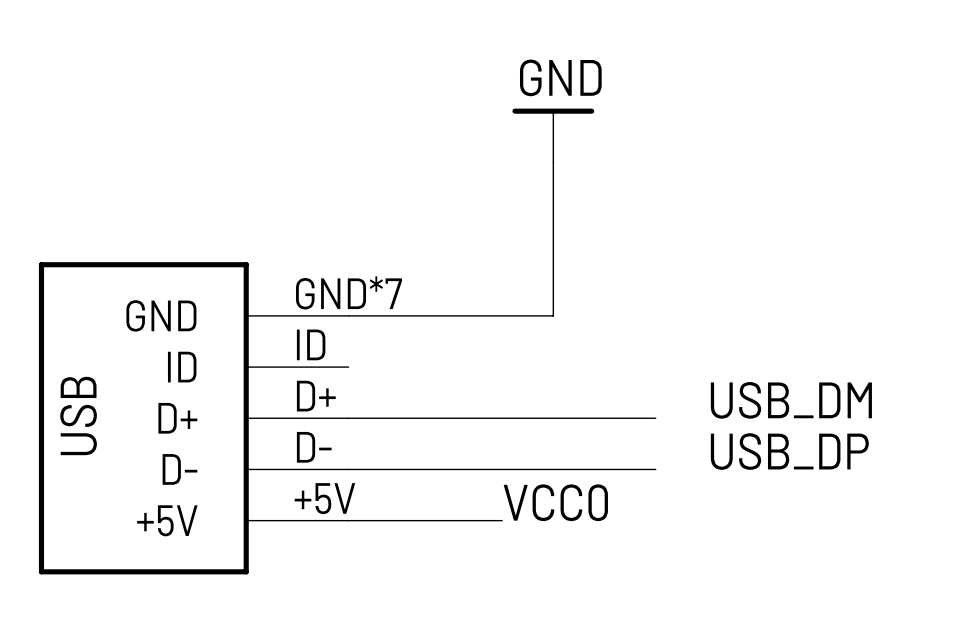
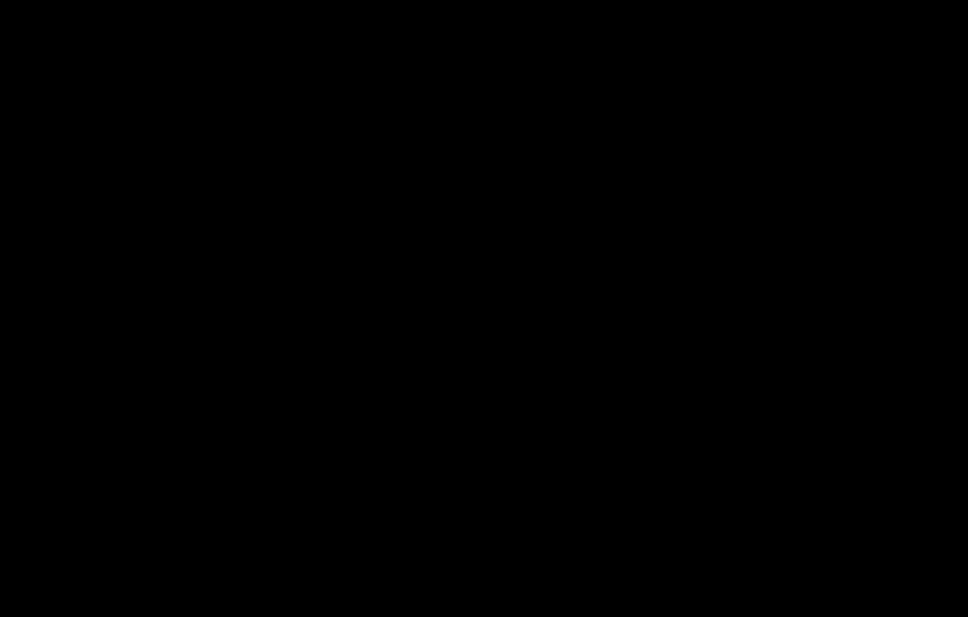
power symbol: GND (553, 135) -> none
wire: (553, 162) (553, 315) (348, 315) -> none
label: USB_DM (791, 400) -> none
part: (193, 418) -> none
wire: (348, 418) (655, 418) -> none
label: USB_DP (789, 451) -> none
wire: (348, 469) (655, 469) -> none
label: VCC0 (555, 502) -> none
wire: (348, 520) (502, 520) -> none

